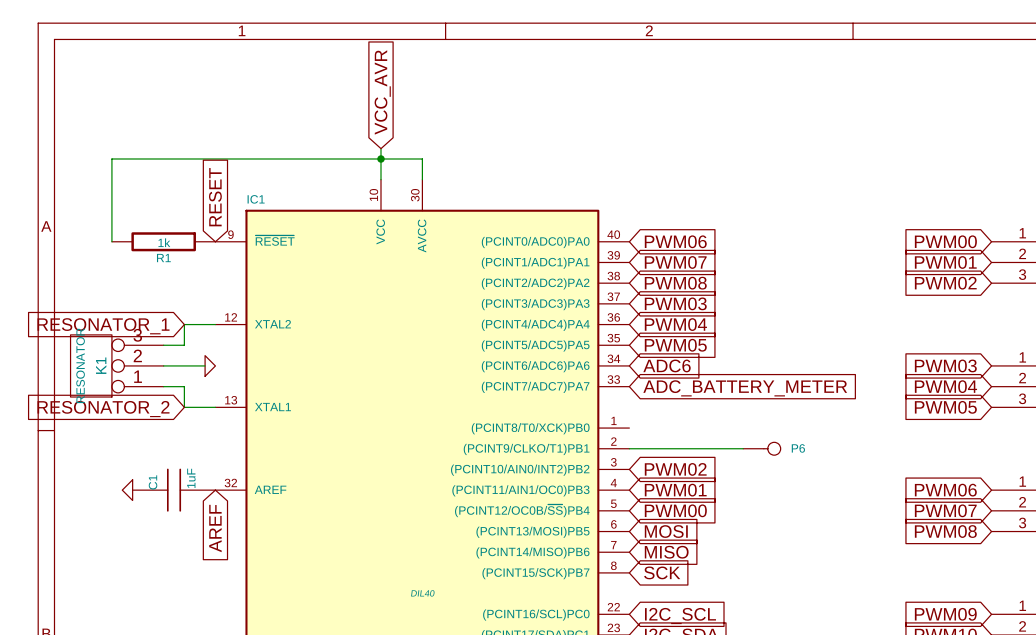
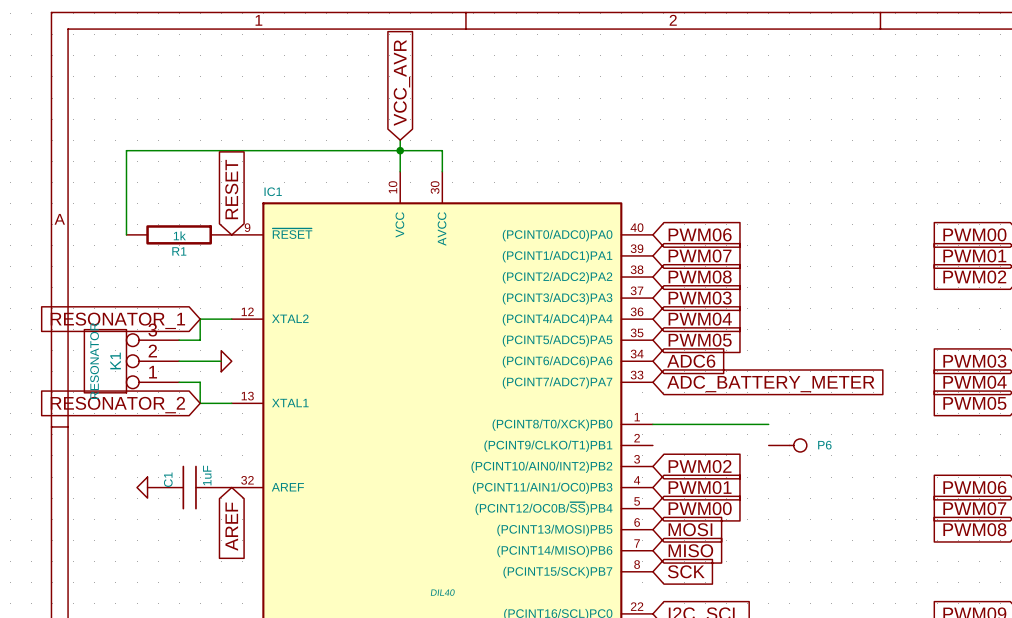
wire: (629, 448) (743, 448) -> (652, 424) (768, 424)

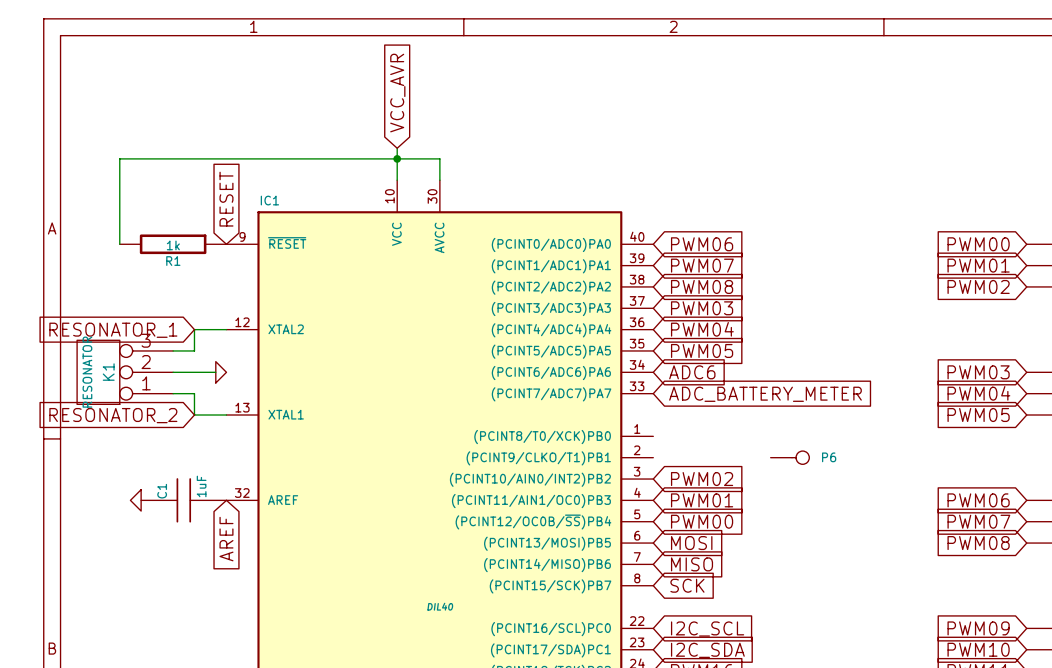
wire: (652, 424) (768, 424) -> none

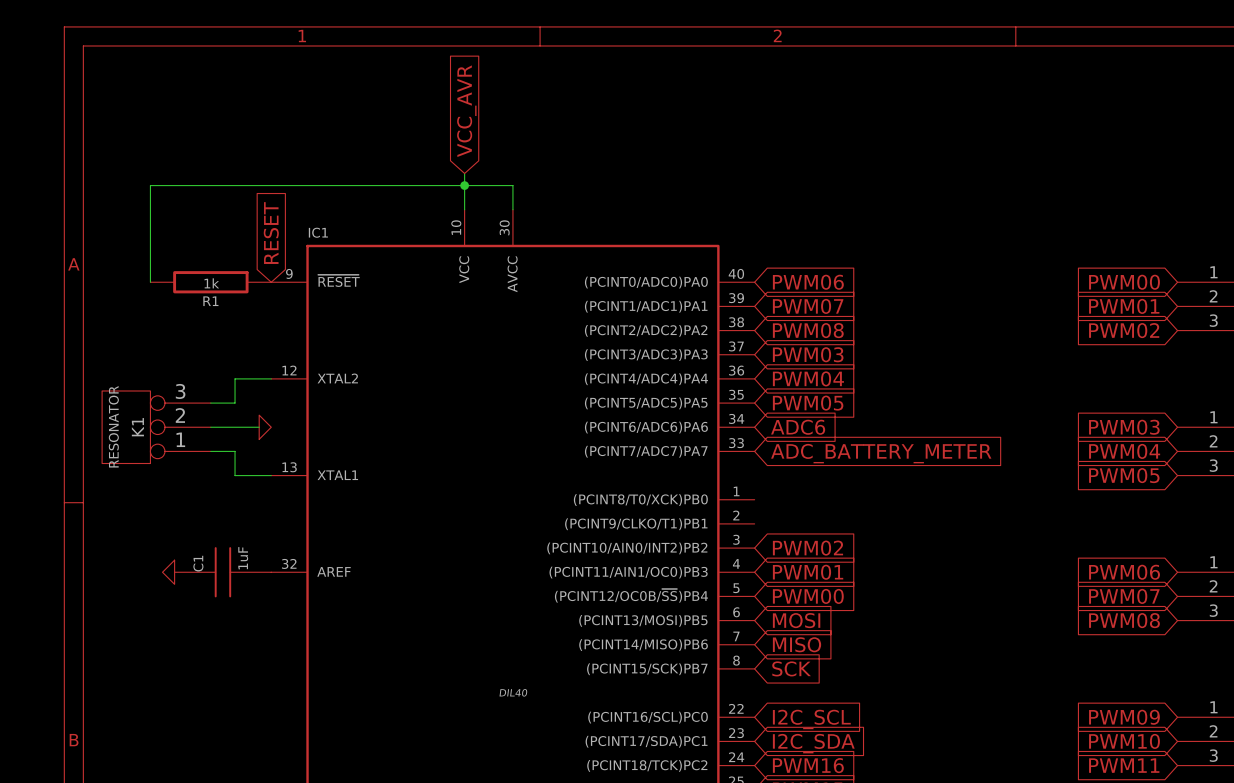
global label: RESONATOR_1 (113, 330) -> none
global label: RESONATOR_2 (113, 415) -> none
P6: (789, 457) -> none
global label: AREF (226, 539) -> none

